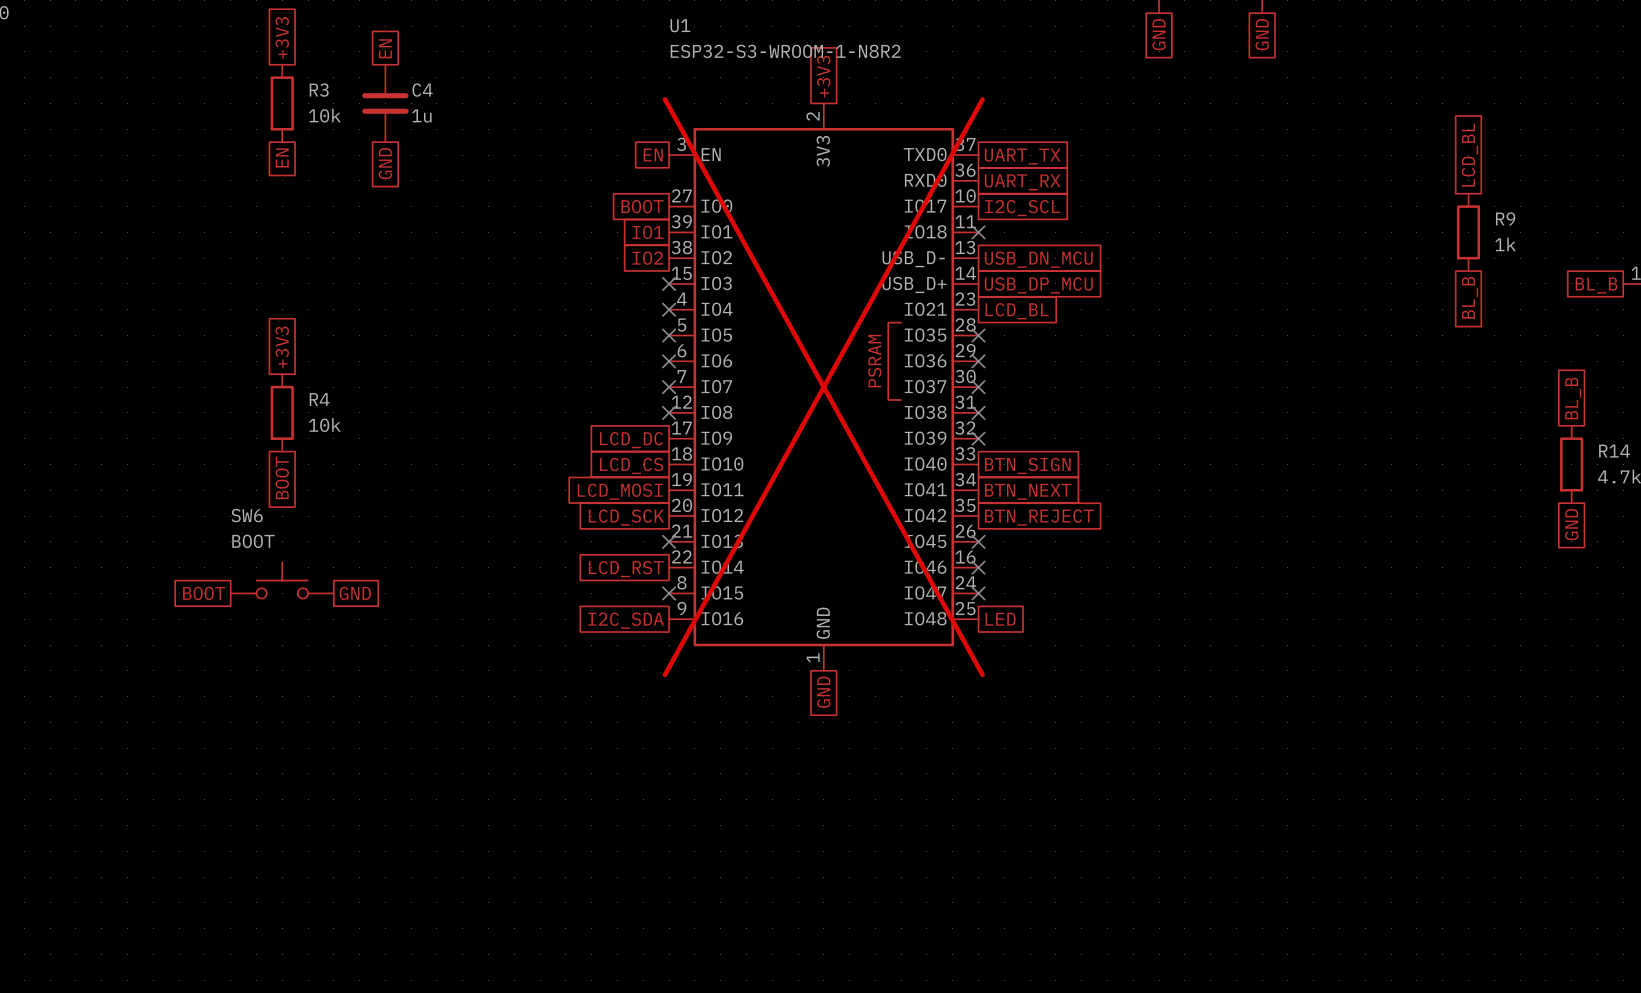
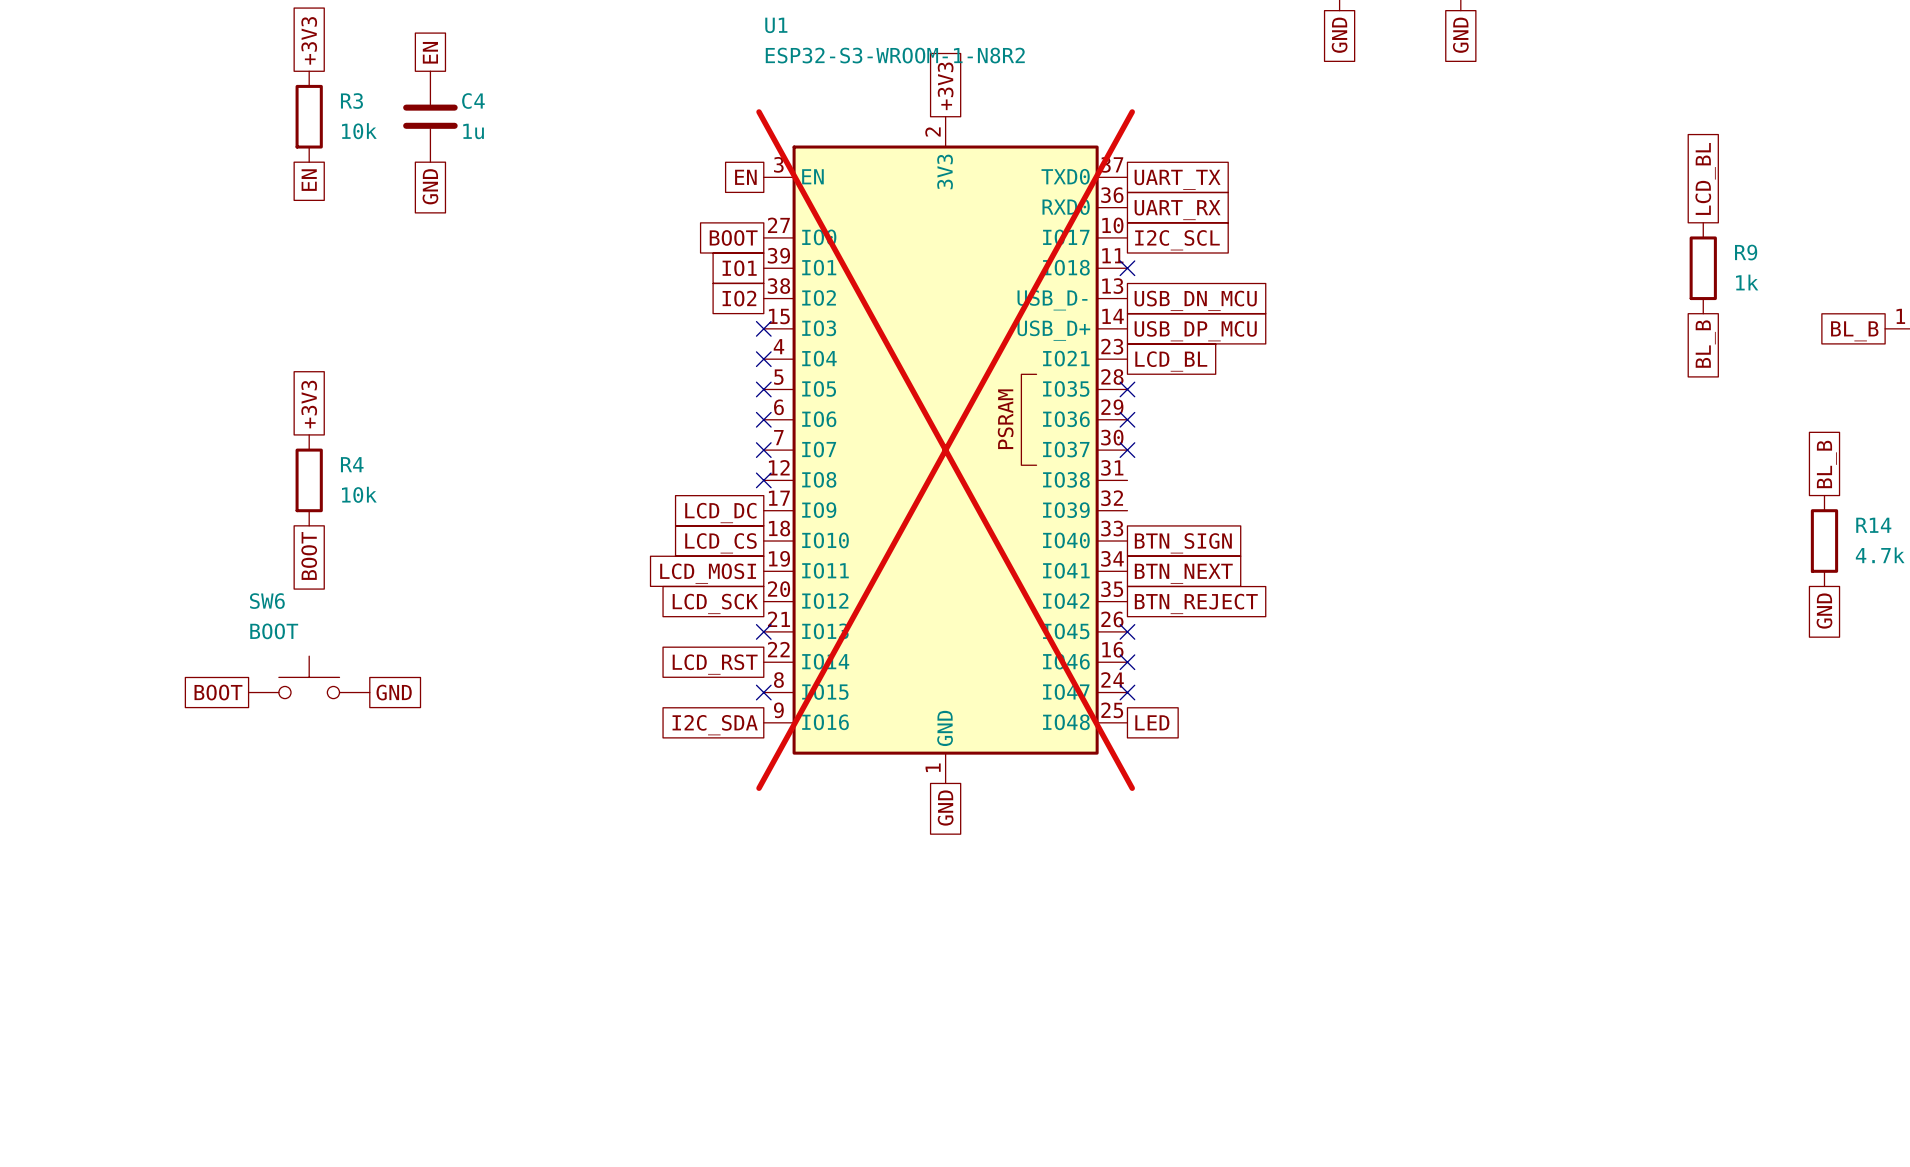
no-connect mark: (978, 412) -> none
no-connect mark: (978, 438) -> none

